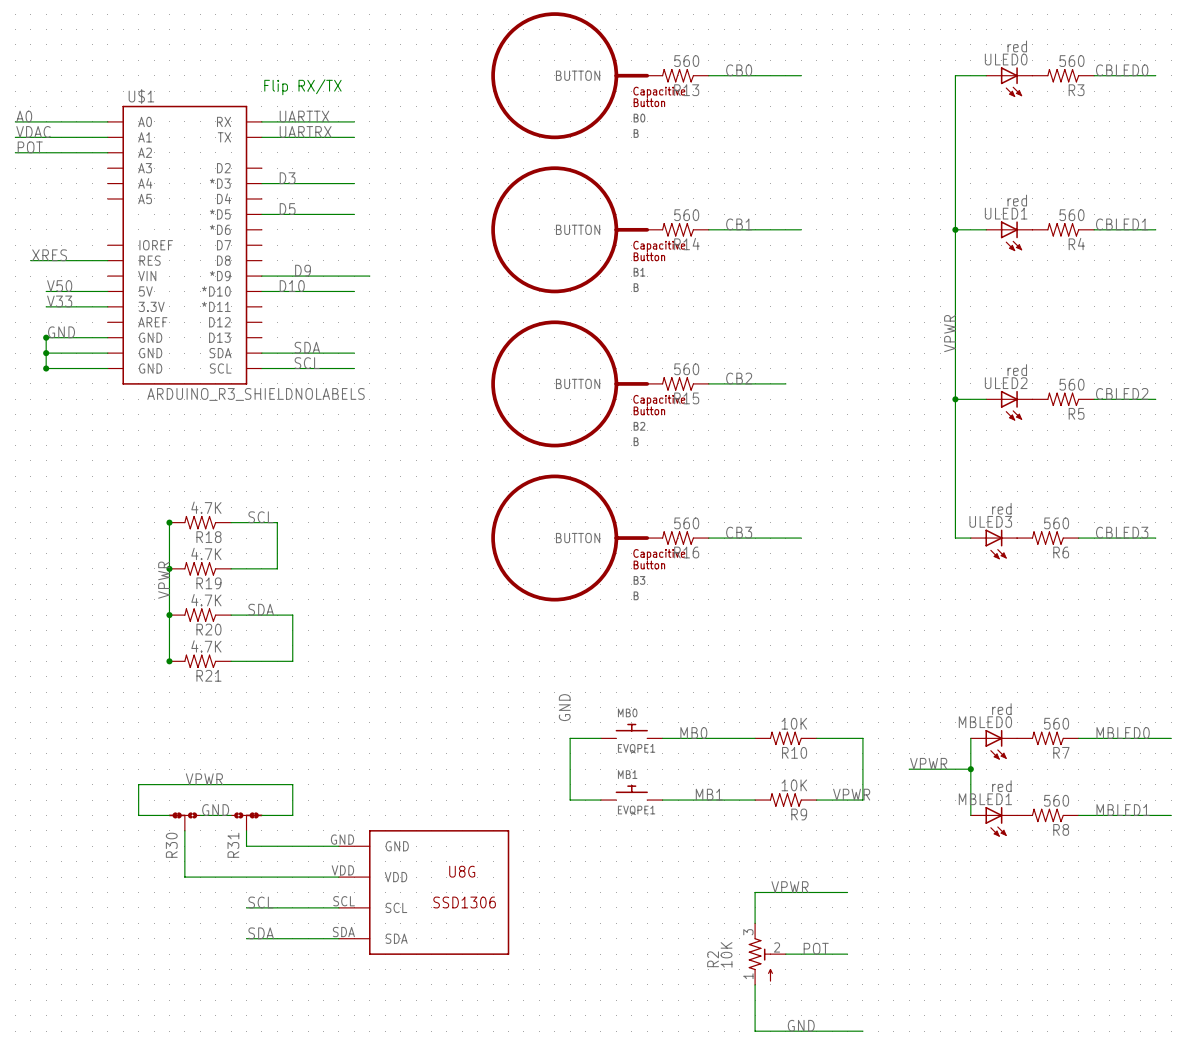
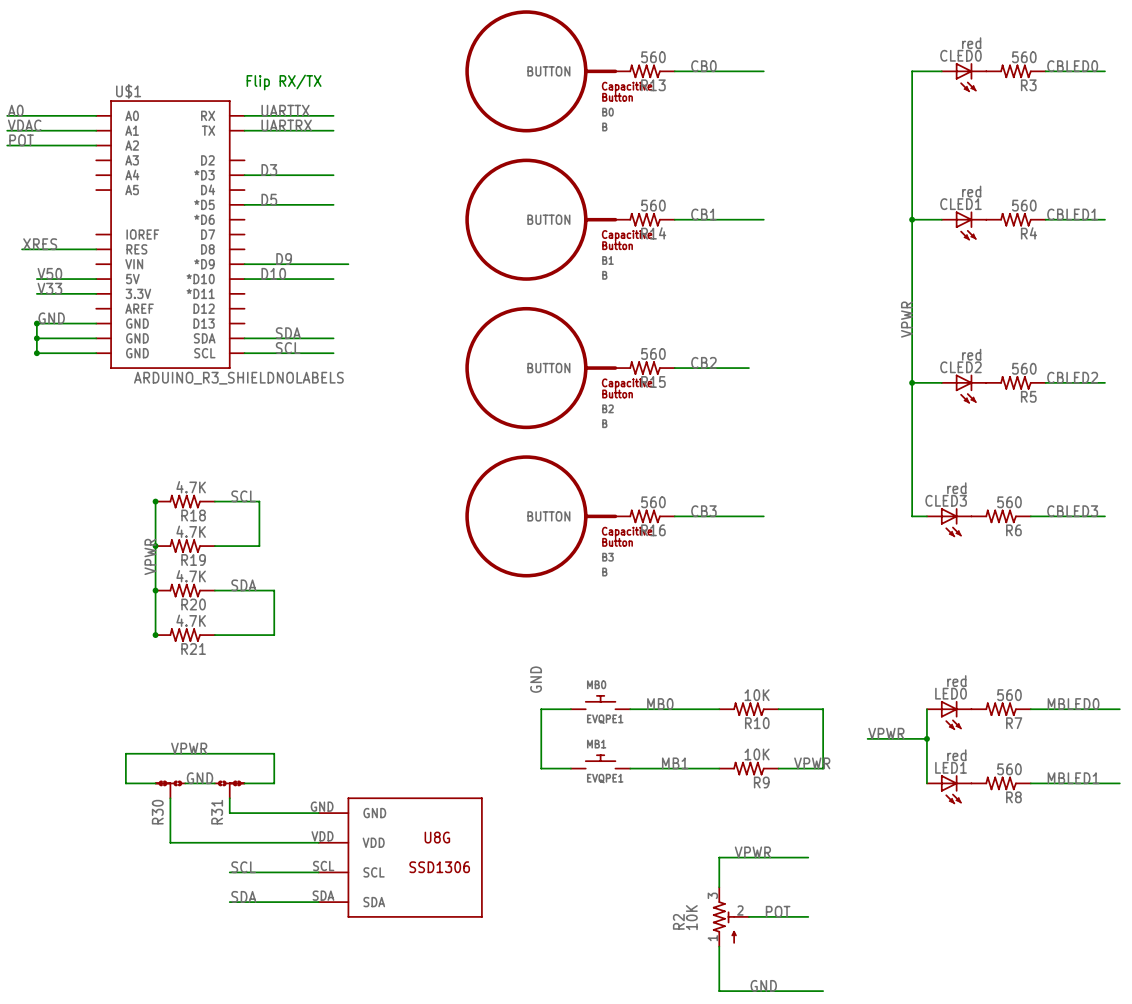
ULED0 name: ULED0 (1006, 59) -> CLED0 (960, 55)
ULED1 name: ULED1 (1006, 213) -> CLED1 (960, 204)
ULED2 name: ULED2 (1006, 383) -> CLED2 (960, 367)
ULED3 name: ULED3 (990, 521) -> CLED3 (946, 500)
MBLED0 name: MBLED0 (985, 722) -> LED0 (951, 693)
MBLED1 name: MBLED1 (985, 799) -> LED1 (951, 767)

